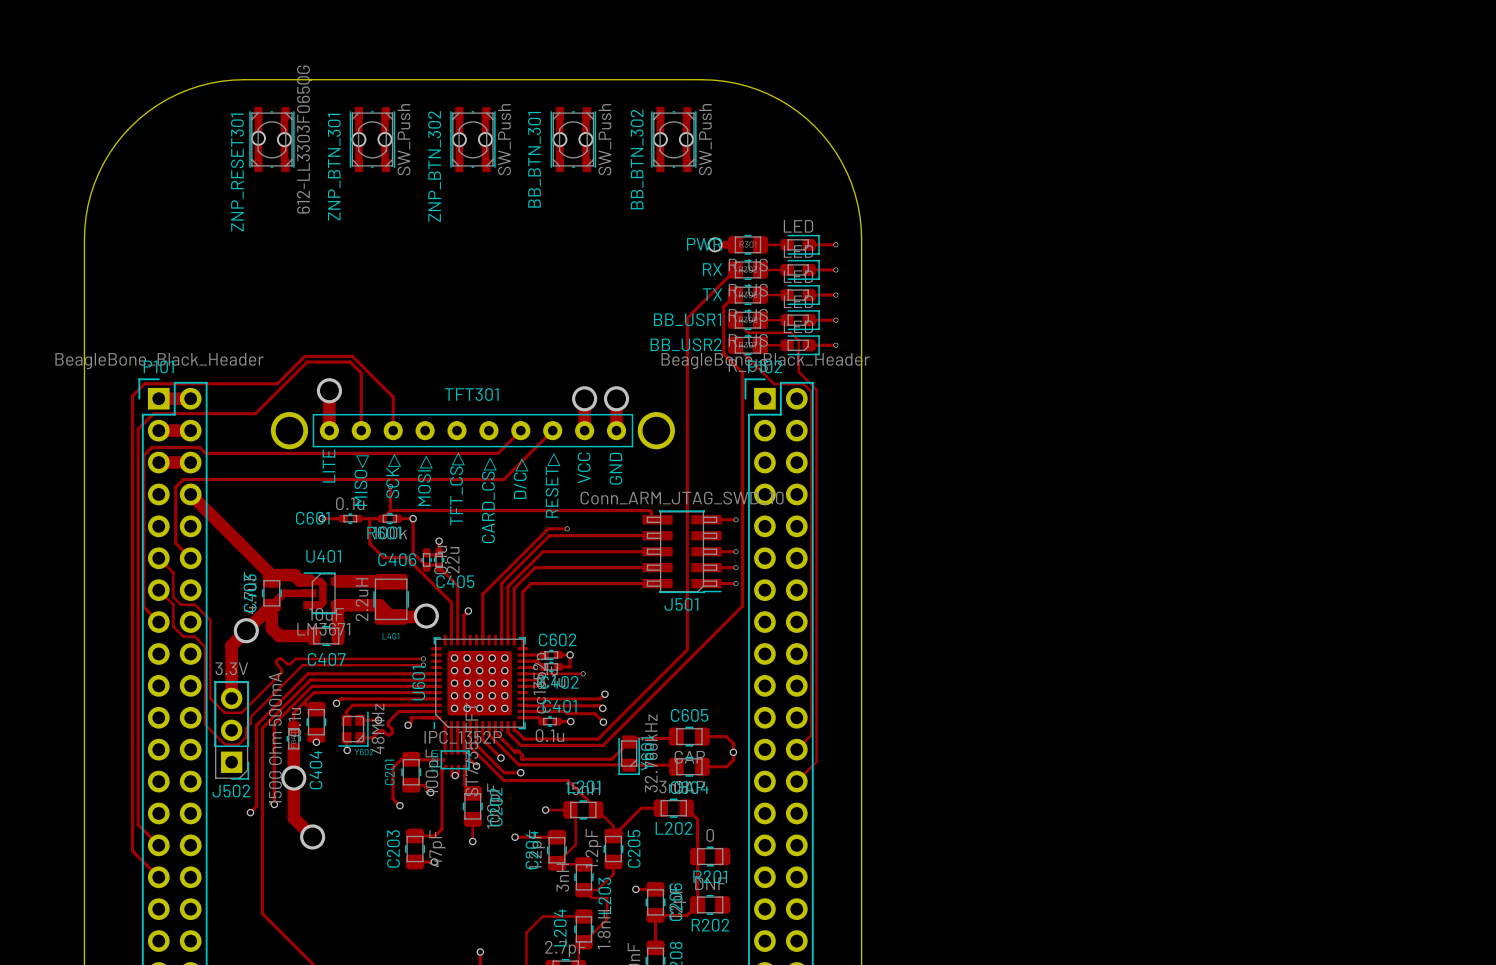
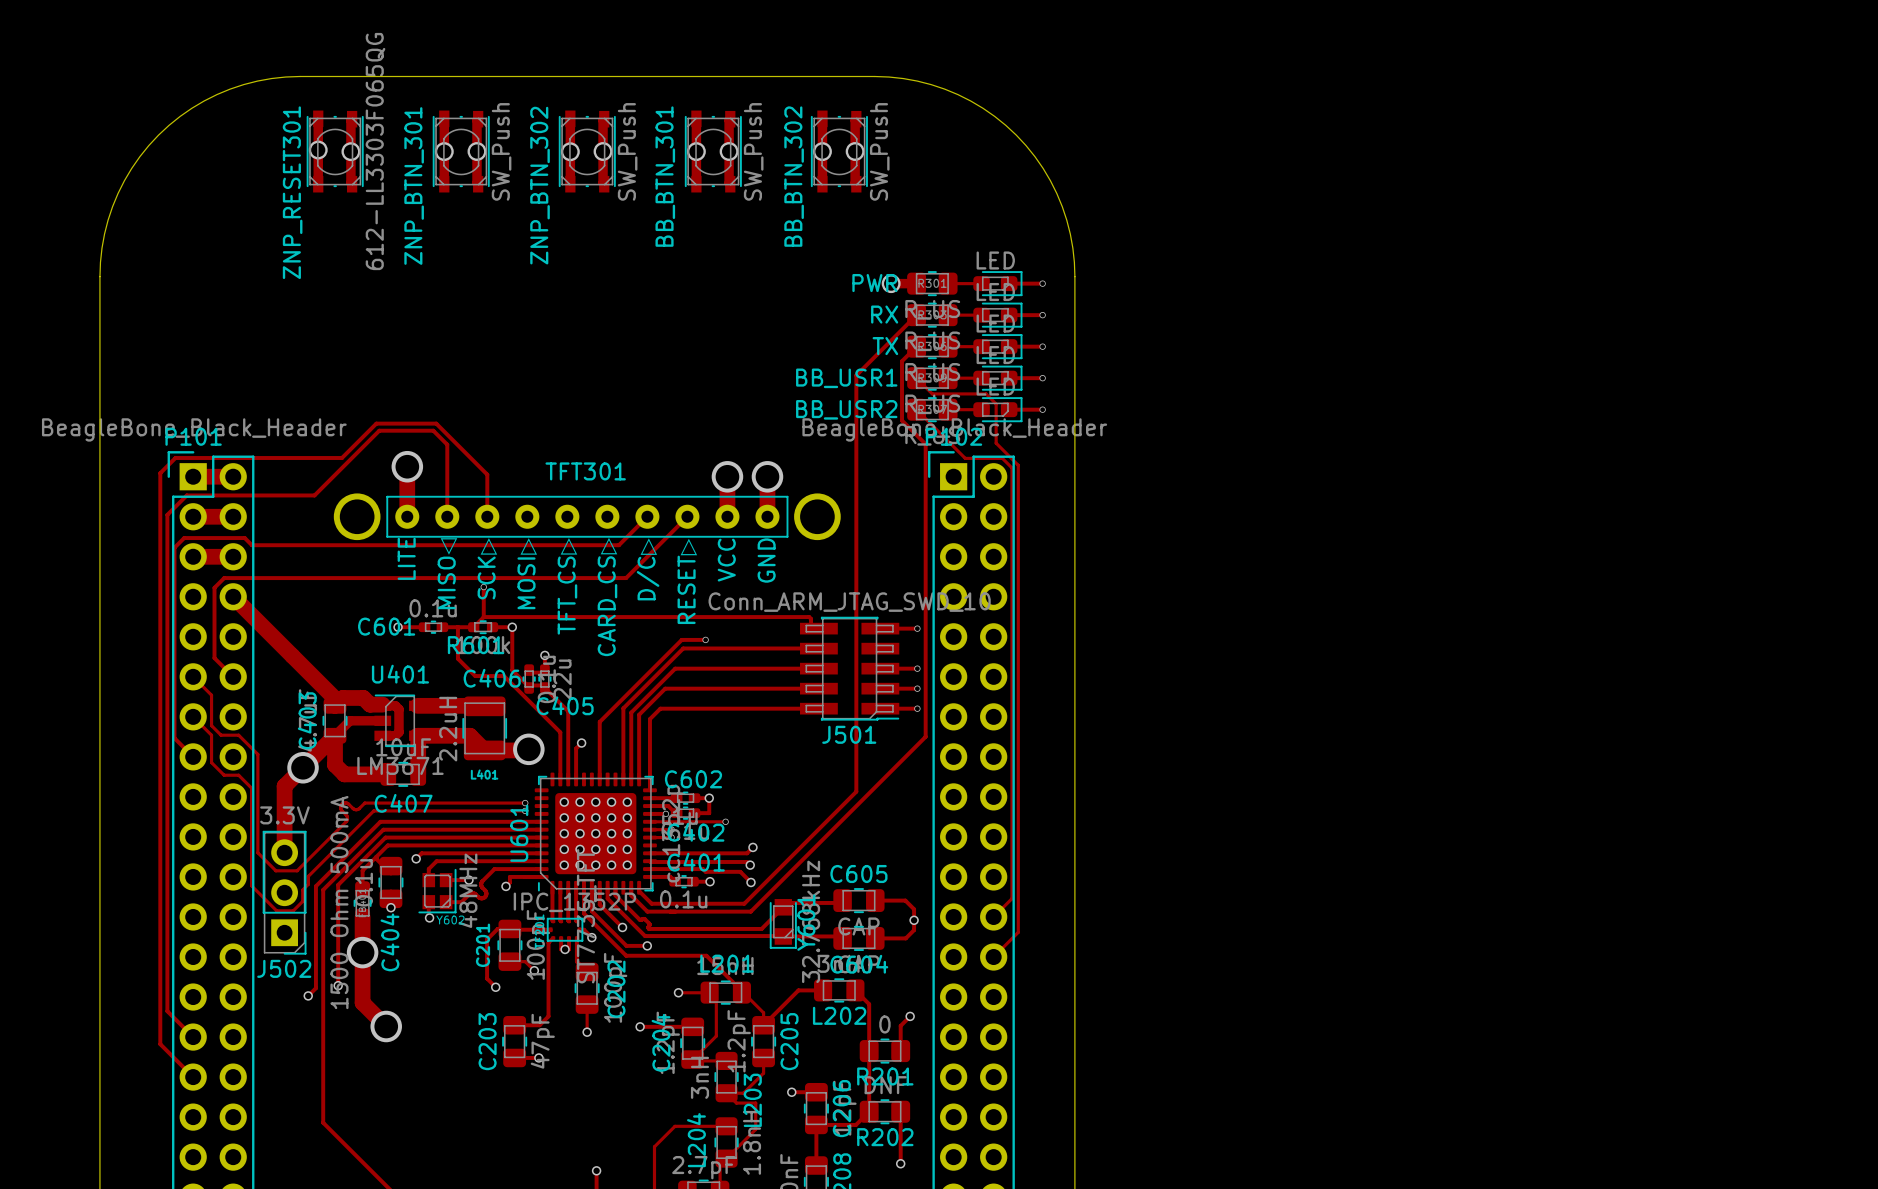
track: none -> (910, 1016) (900, 1025) (900, 1051)
via: none -> (910, 1016)
track: none -> (900, 1111) (900, 1163)
via: none -> (900, 1163)

